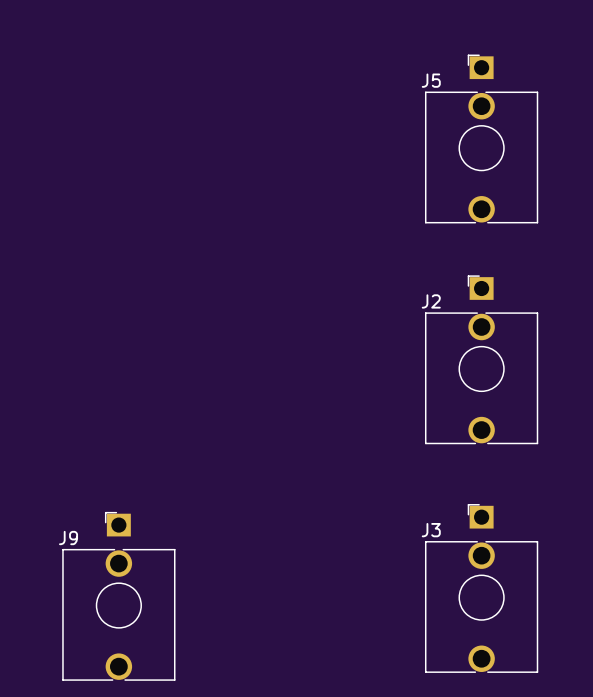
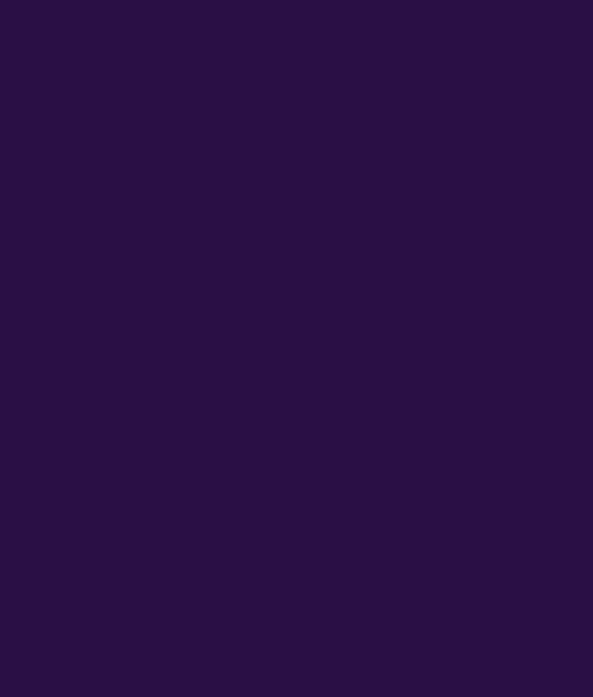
J5: (481, 138) -> none
J2: (481, 359) -> none
J3: (481, 588) -> none
J9: (118, 596) -> none

